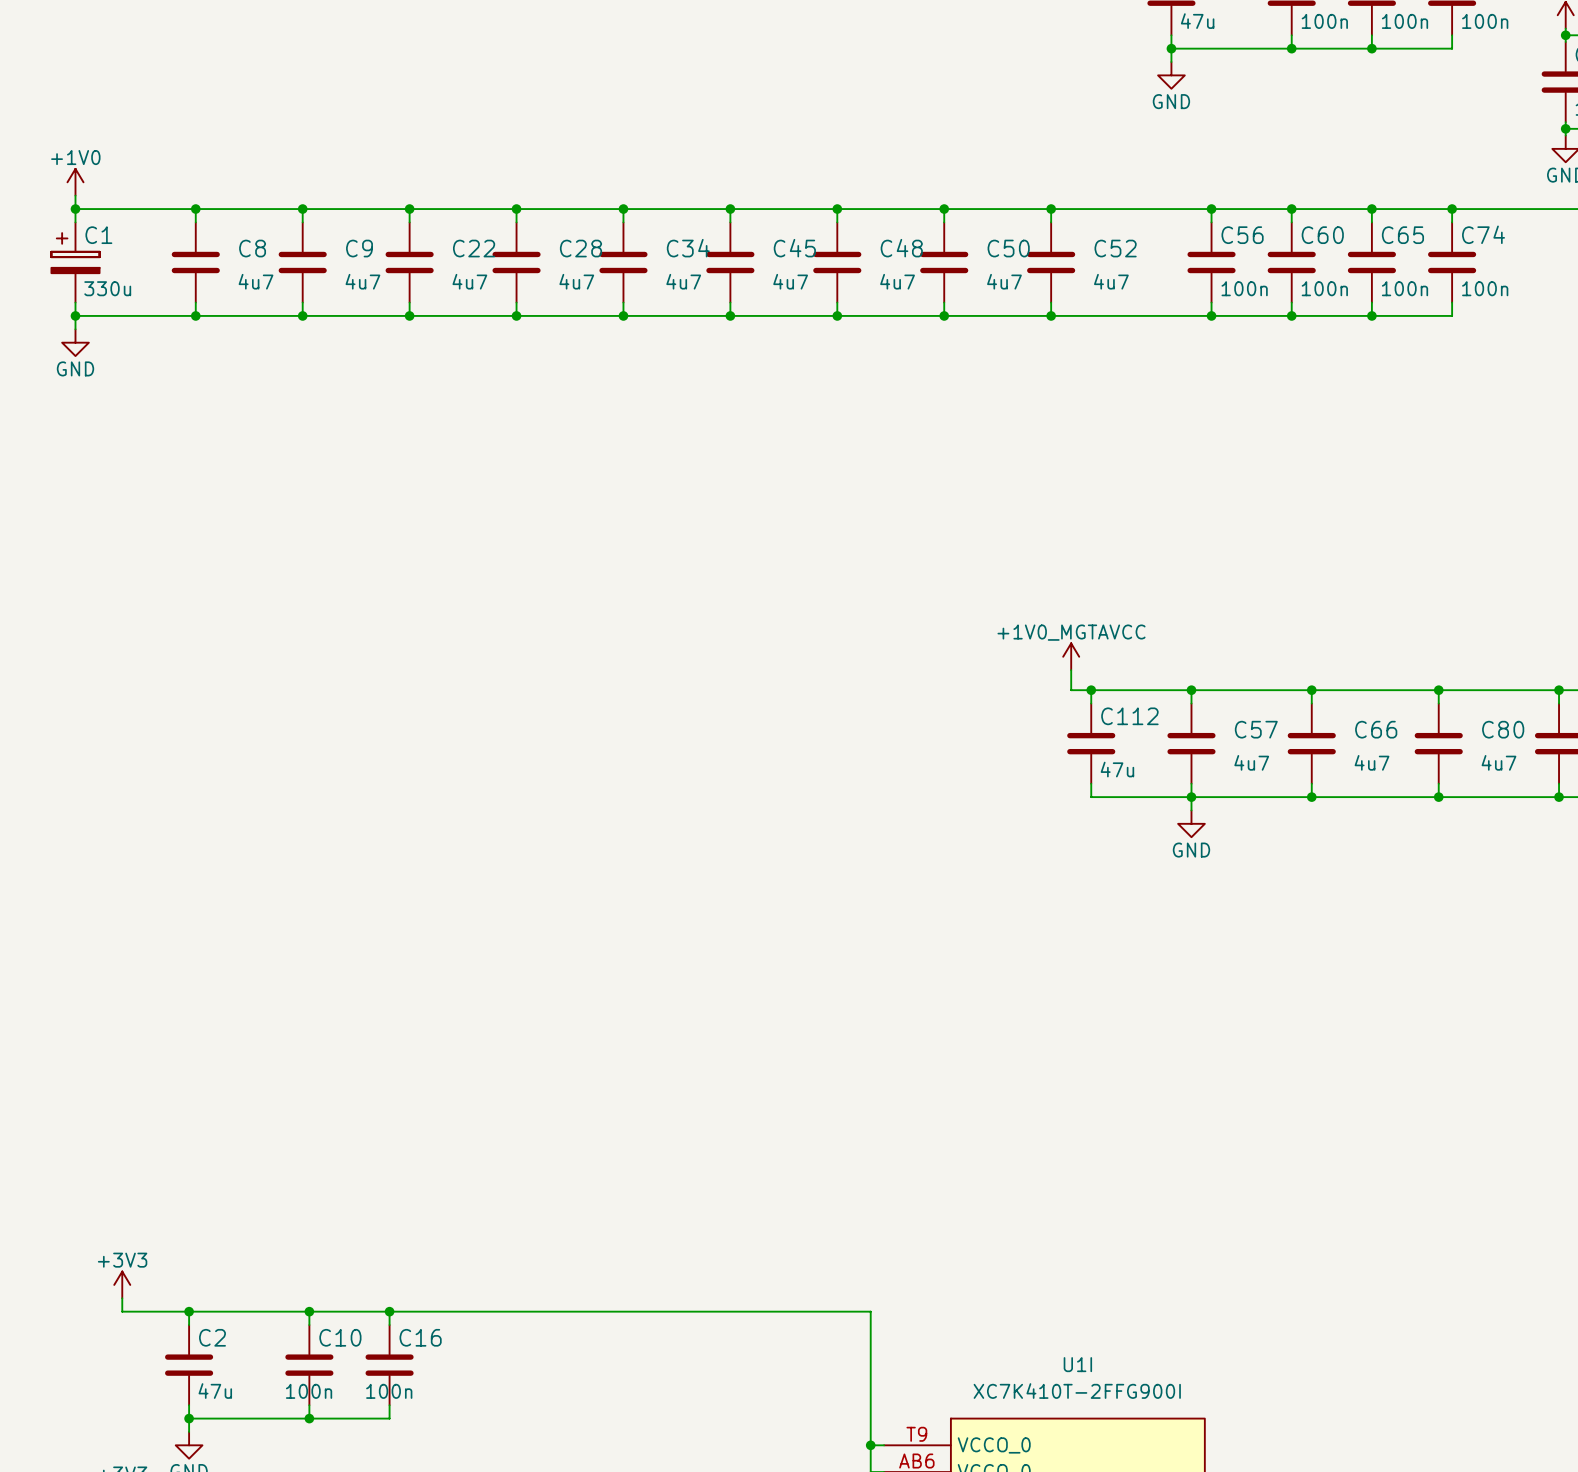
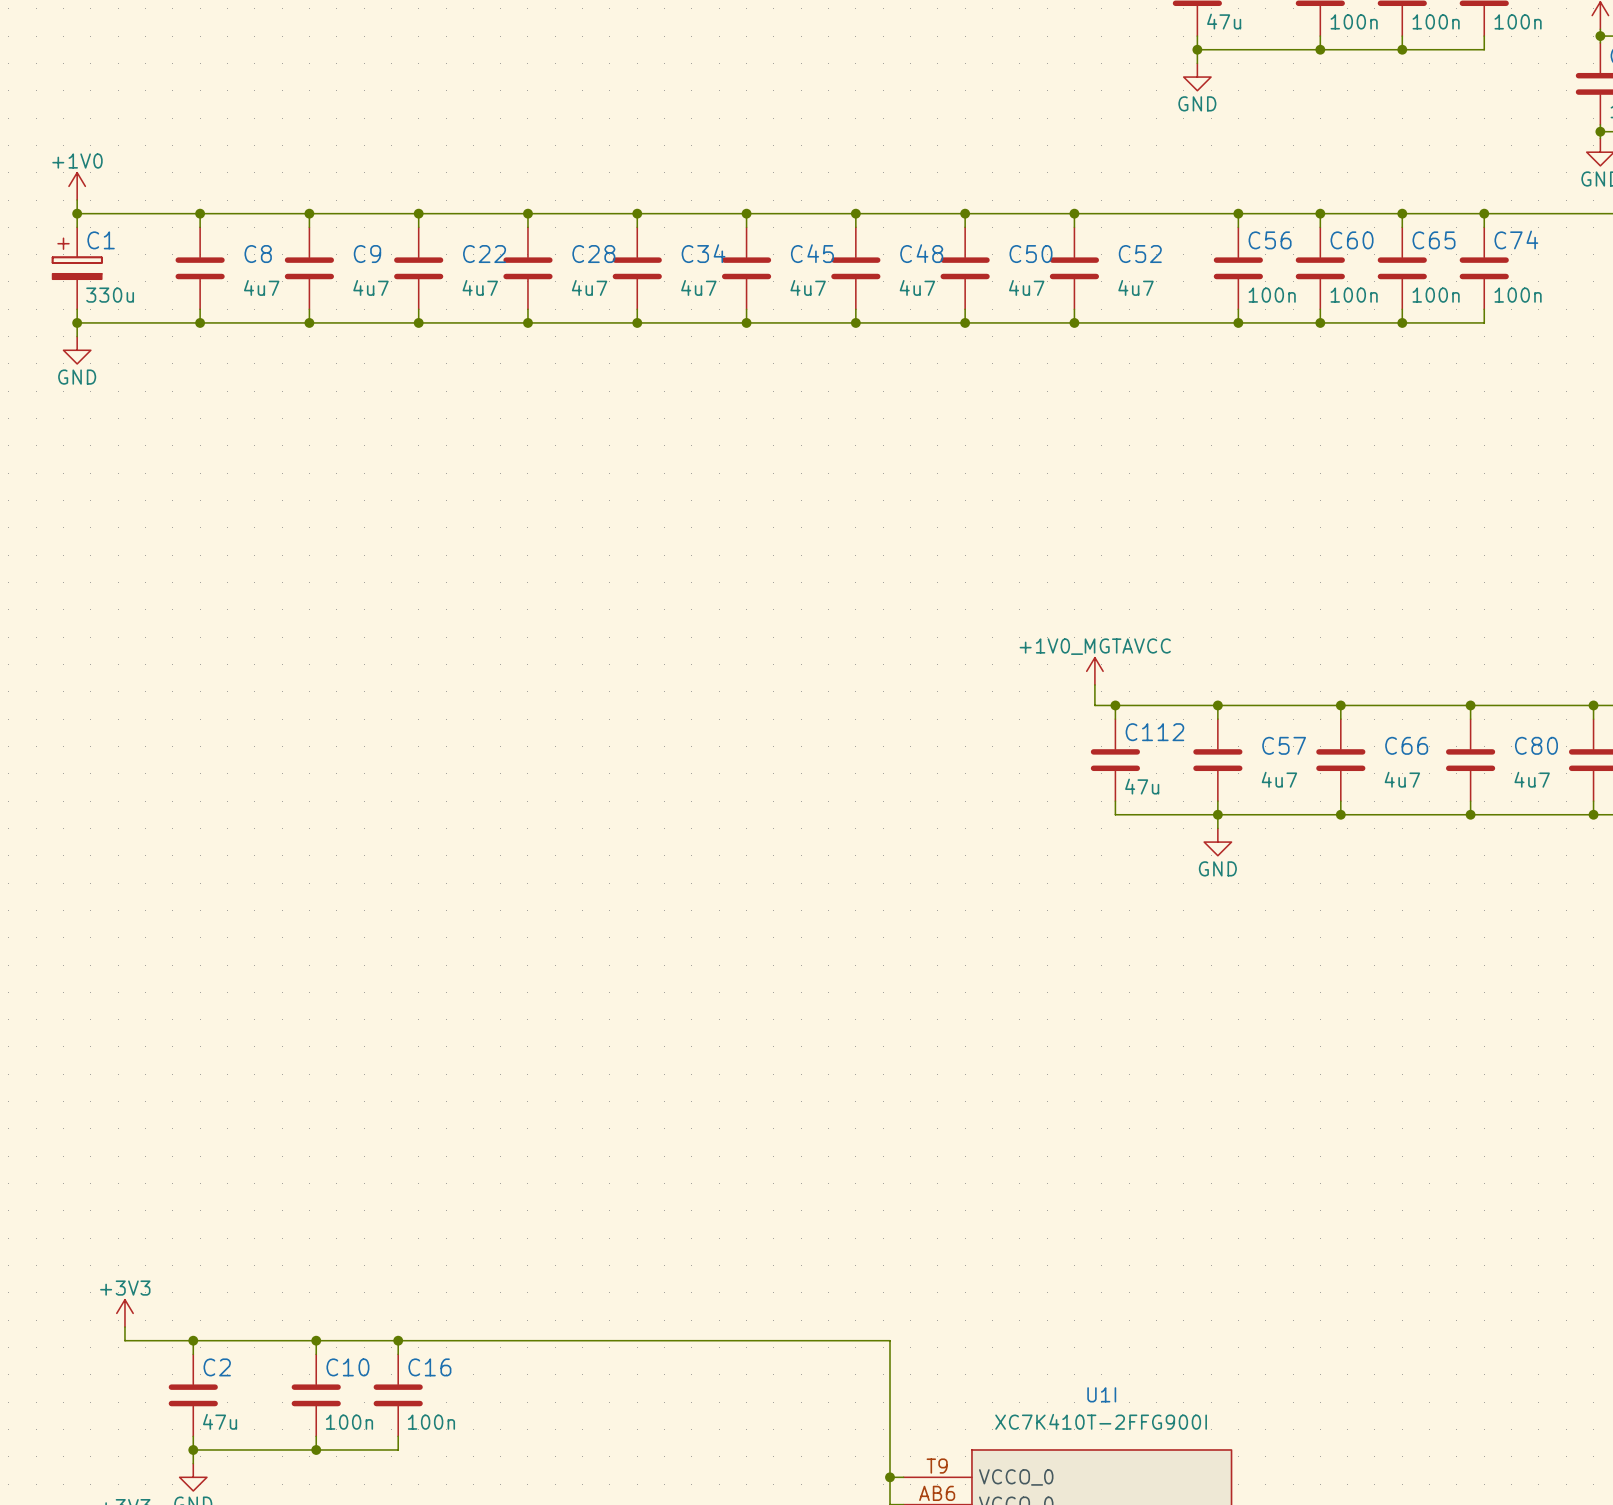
C10 text position: 100n (309, 1391) -> 100n (349, 1422)
C16 text position: 100n (389, 1391) -> 100n (431, 1422)

